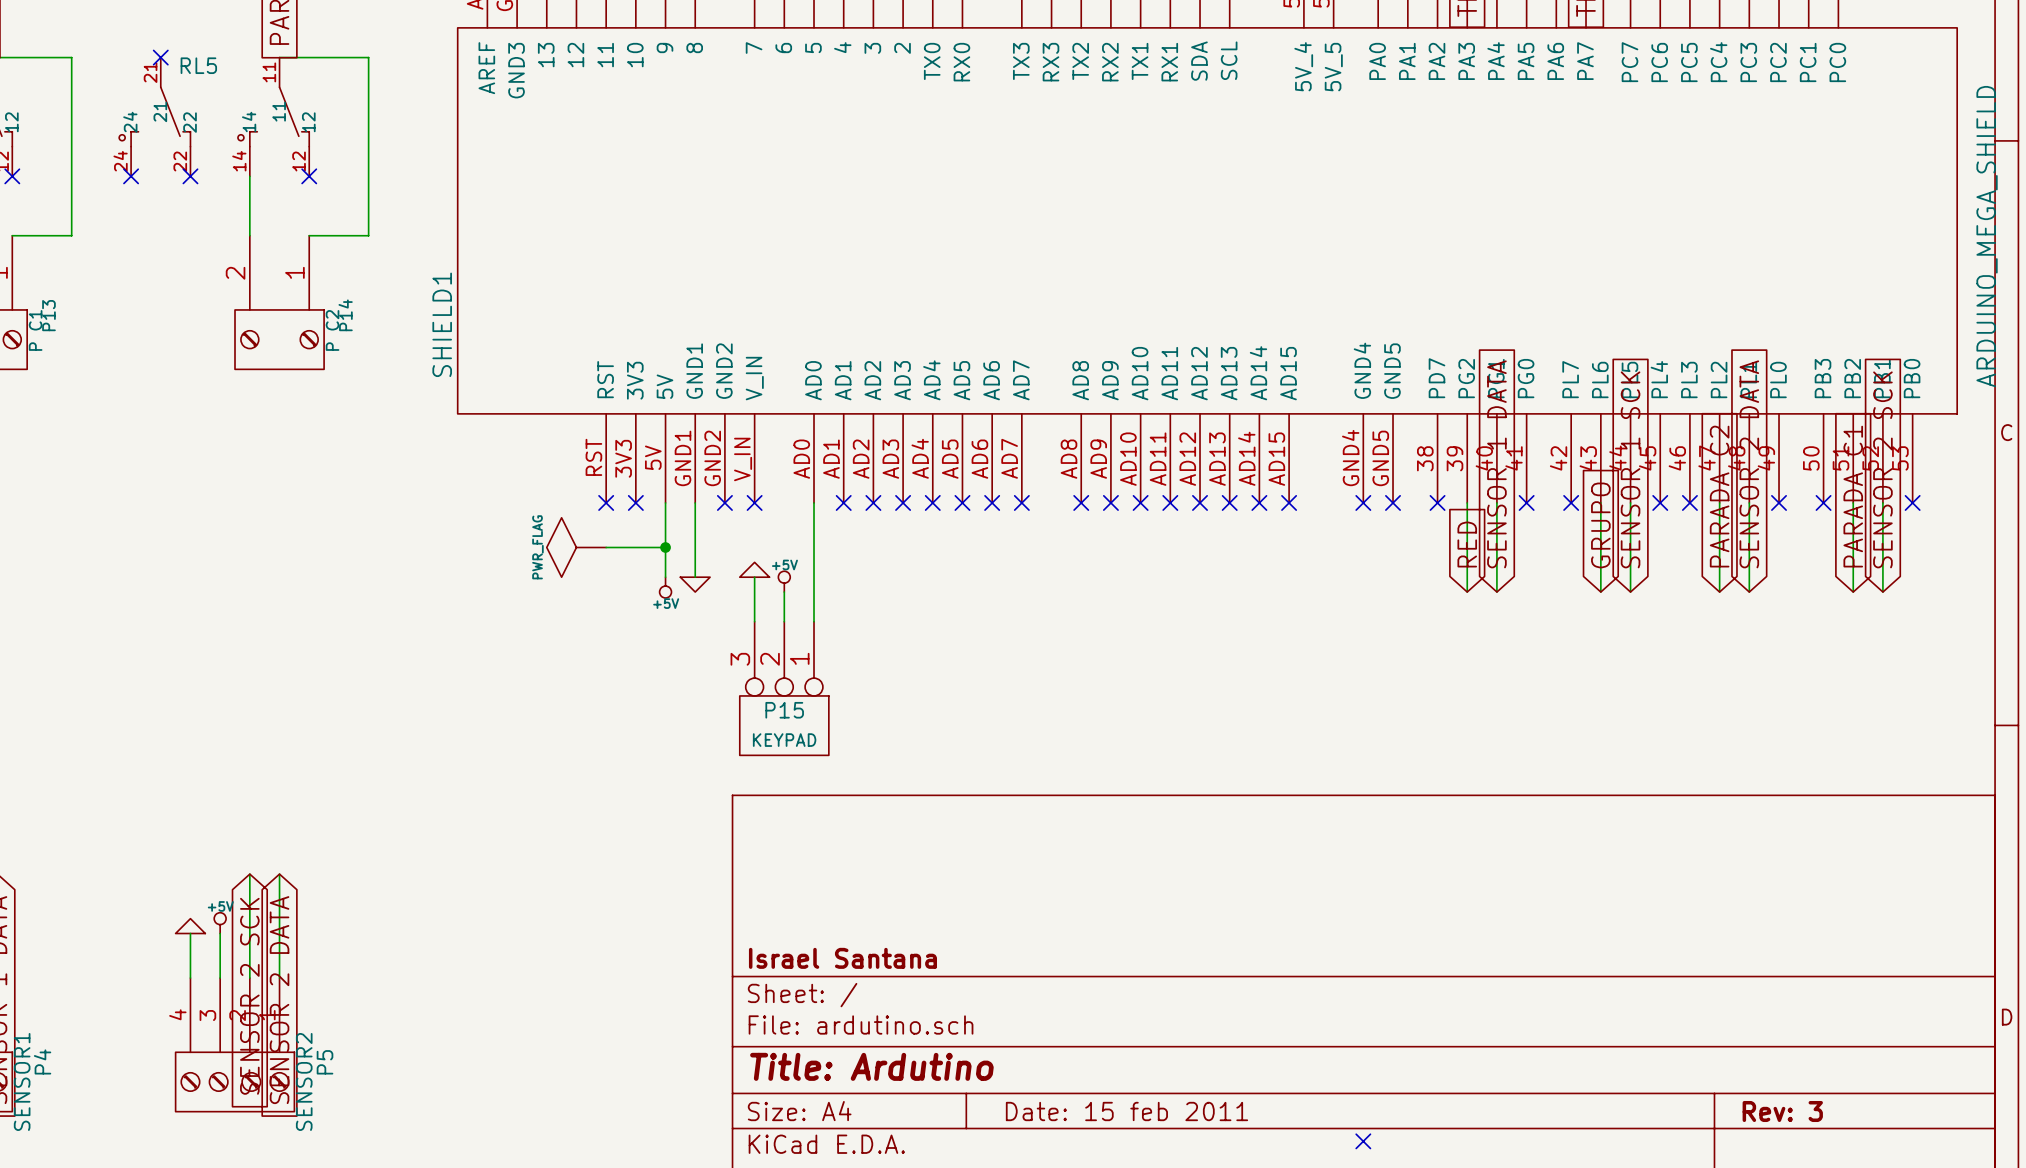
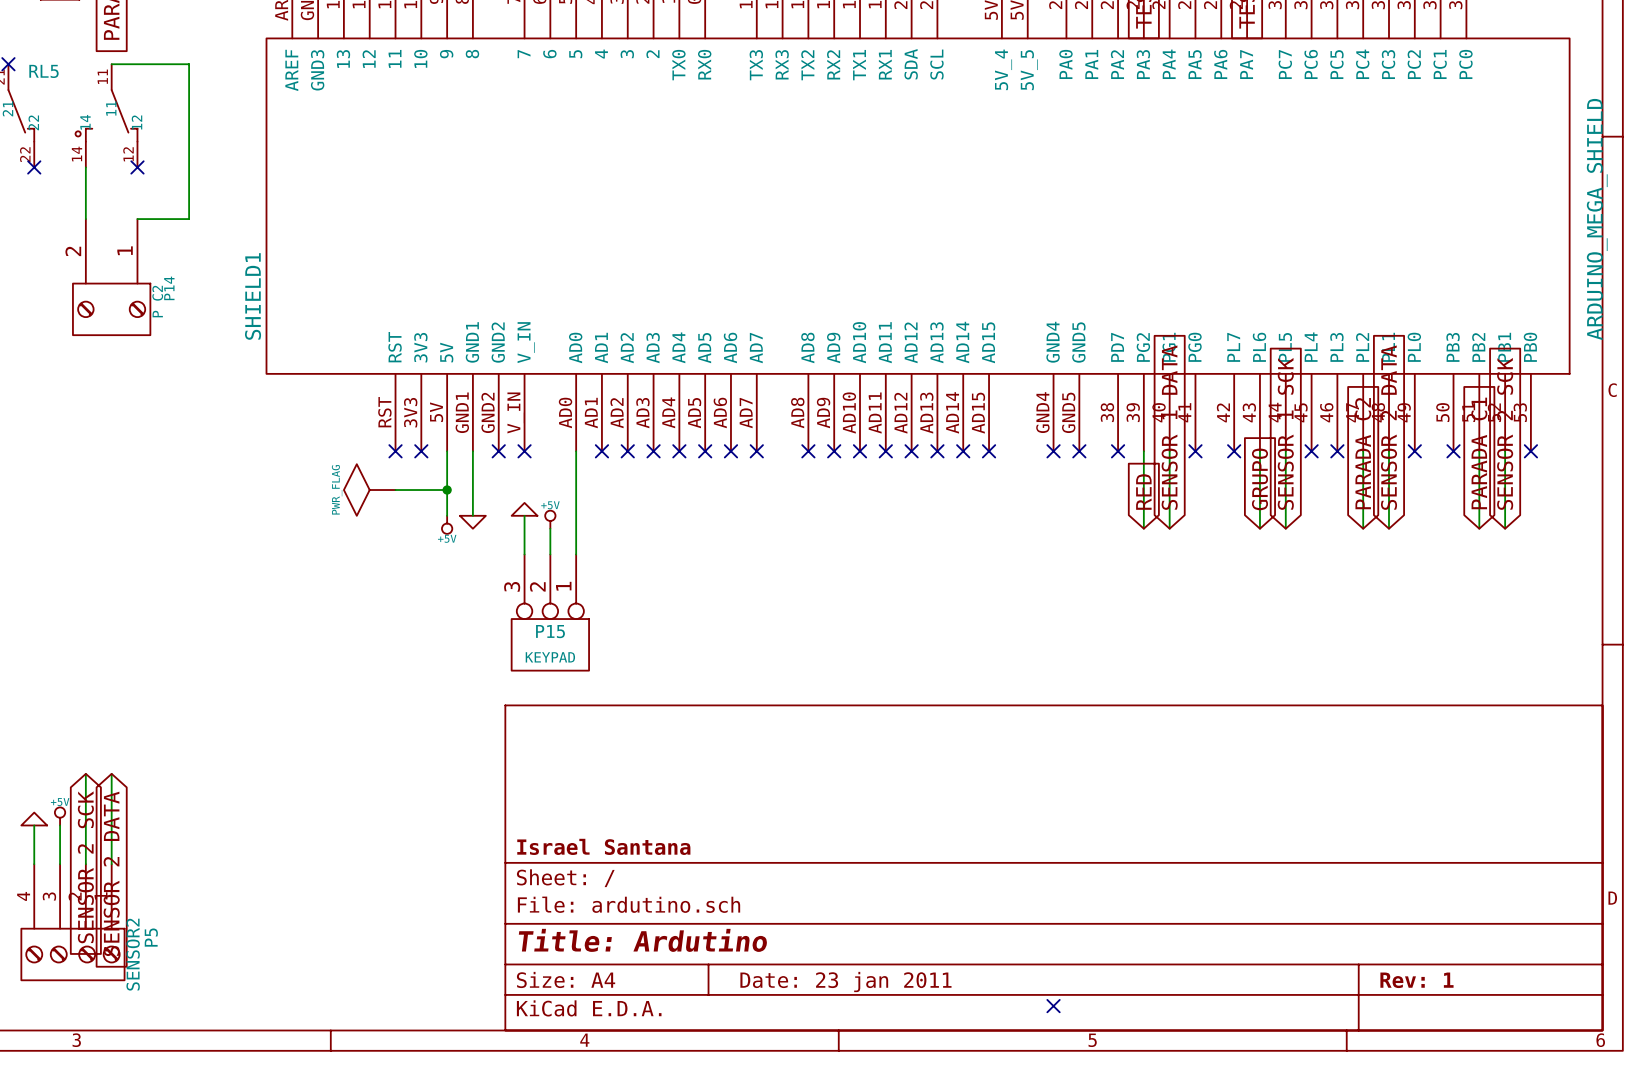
title block: Date: 15 feb 2011 (1126, 1111) -> Date: 23 jan 2011 (845, 982)
title block: Rev: 3 (1782, 1111) -> Rev: 1 (1416, 980)

